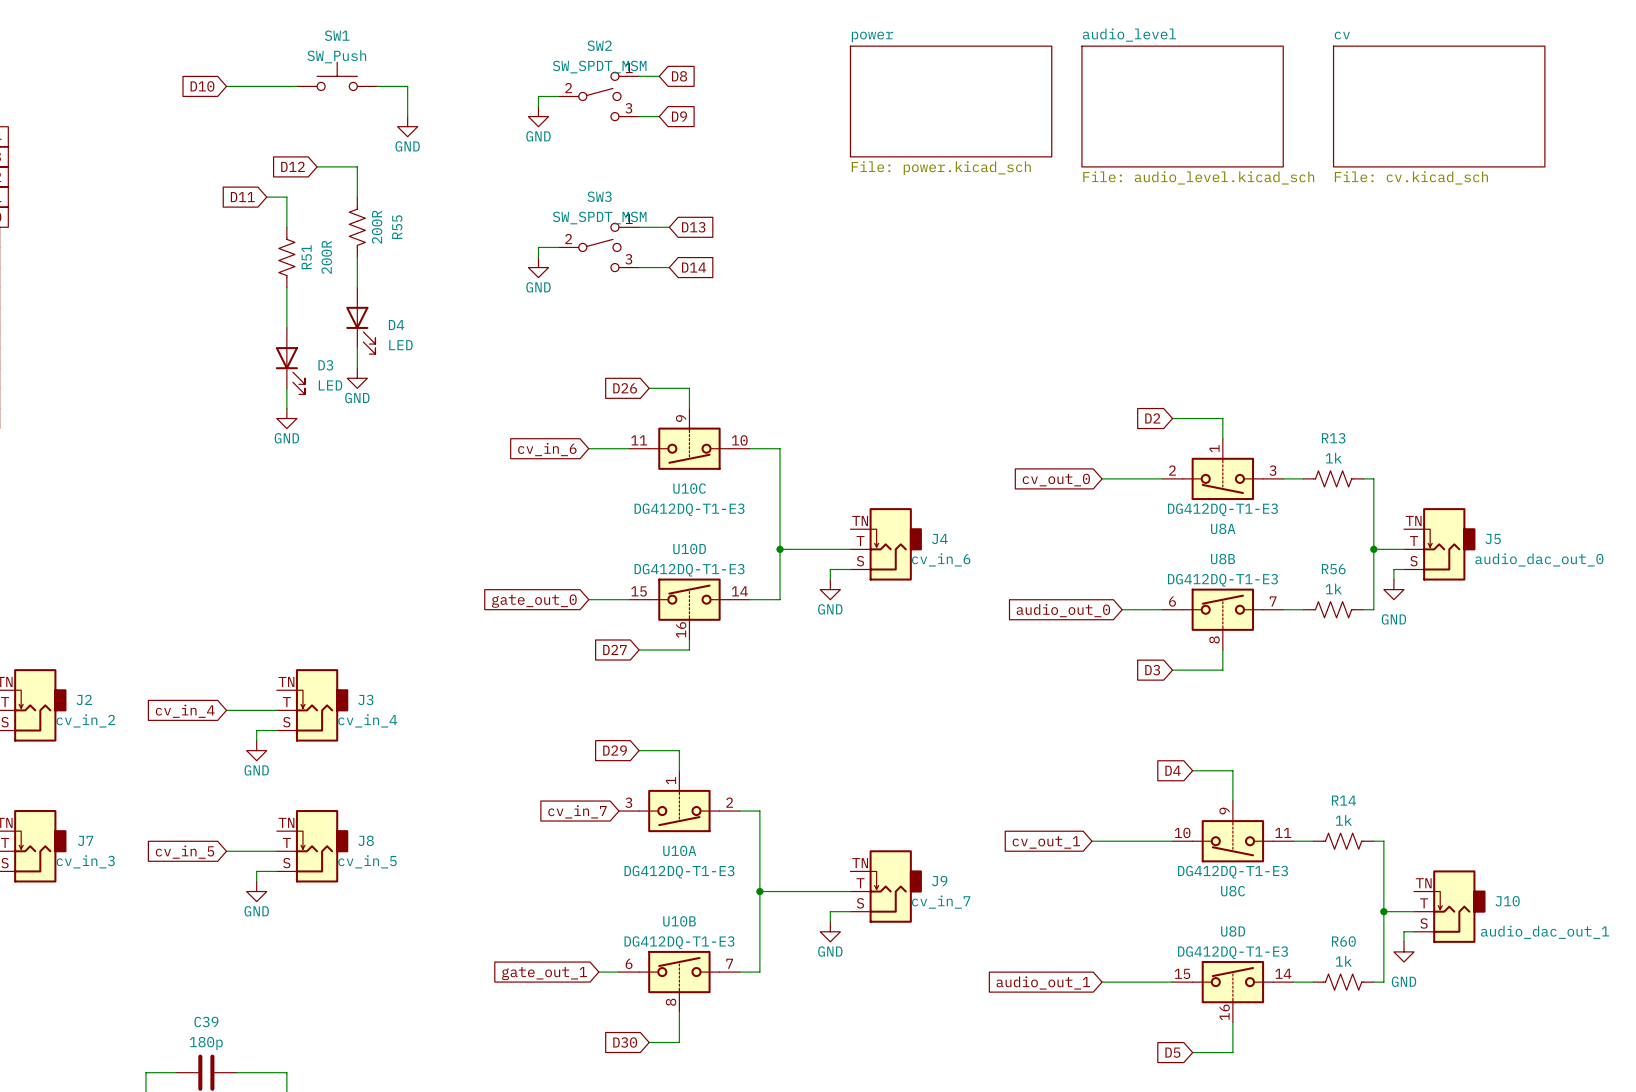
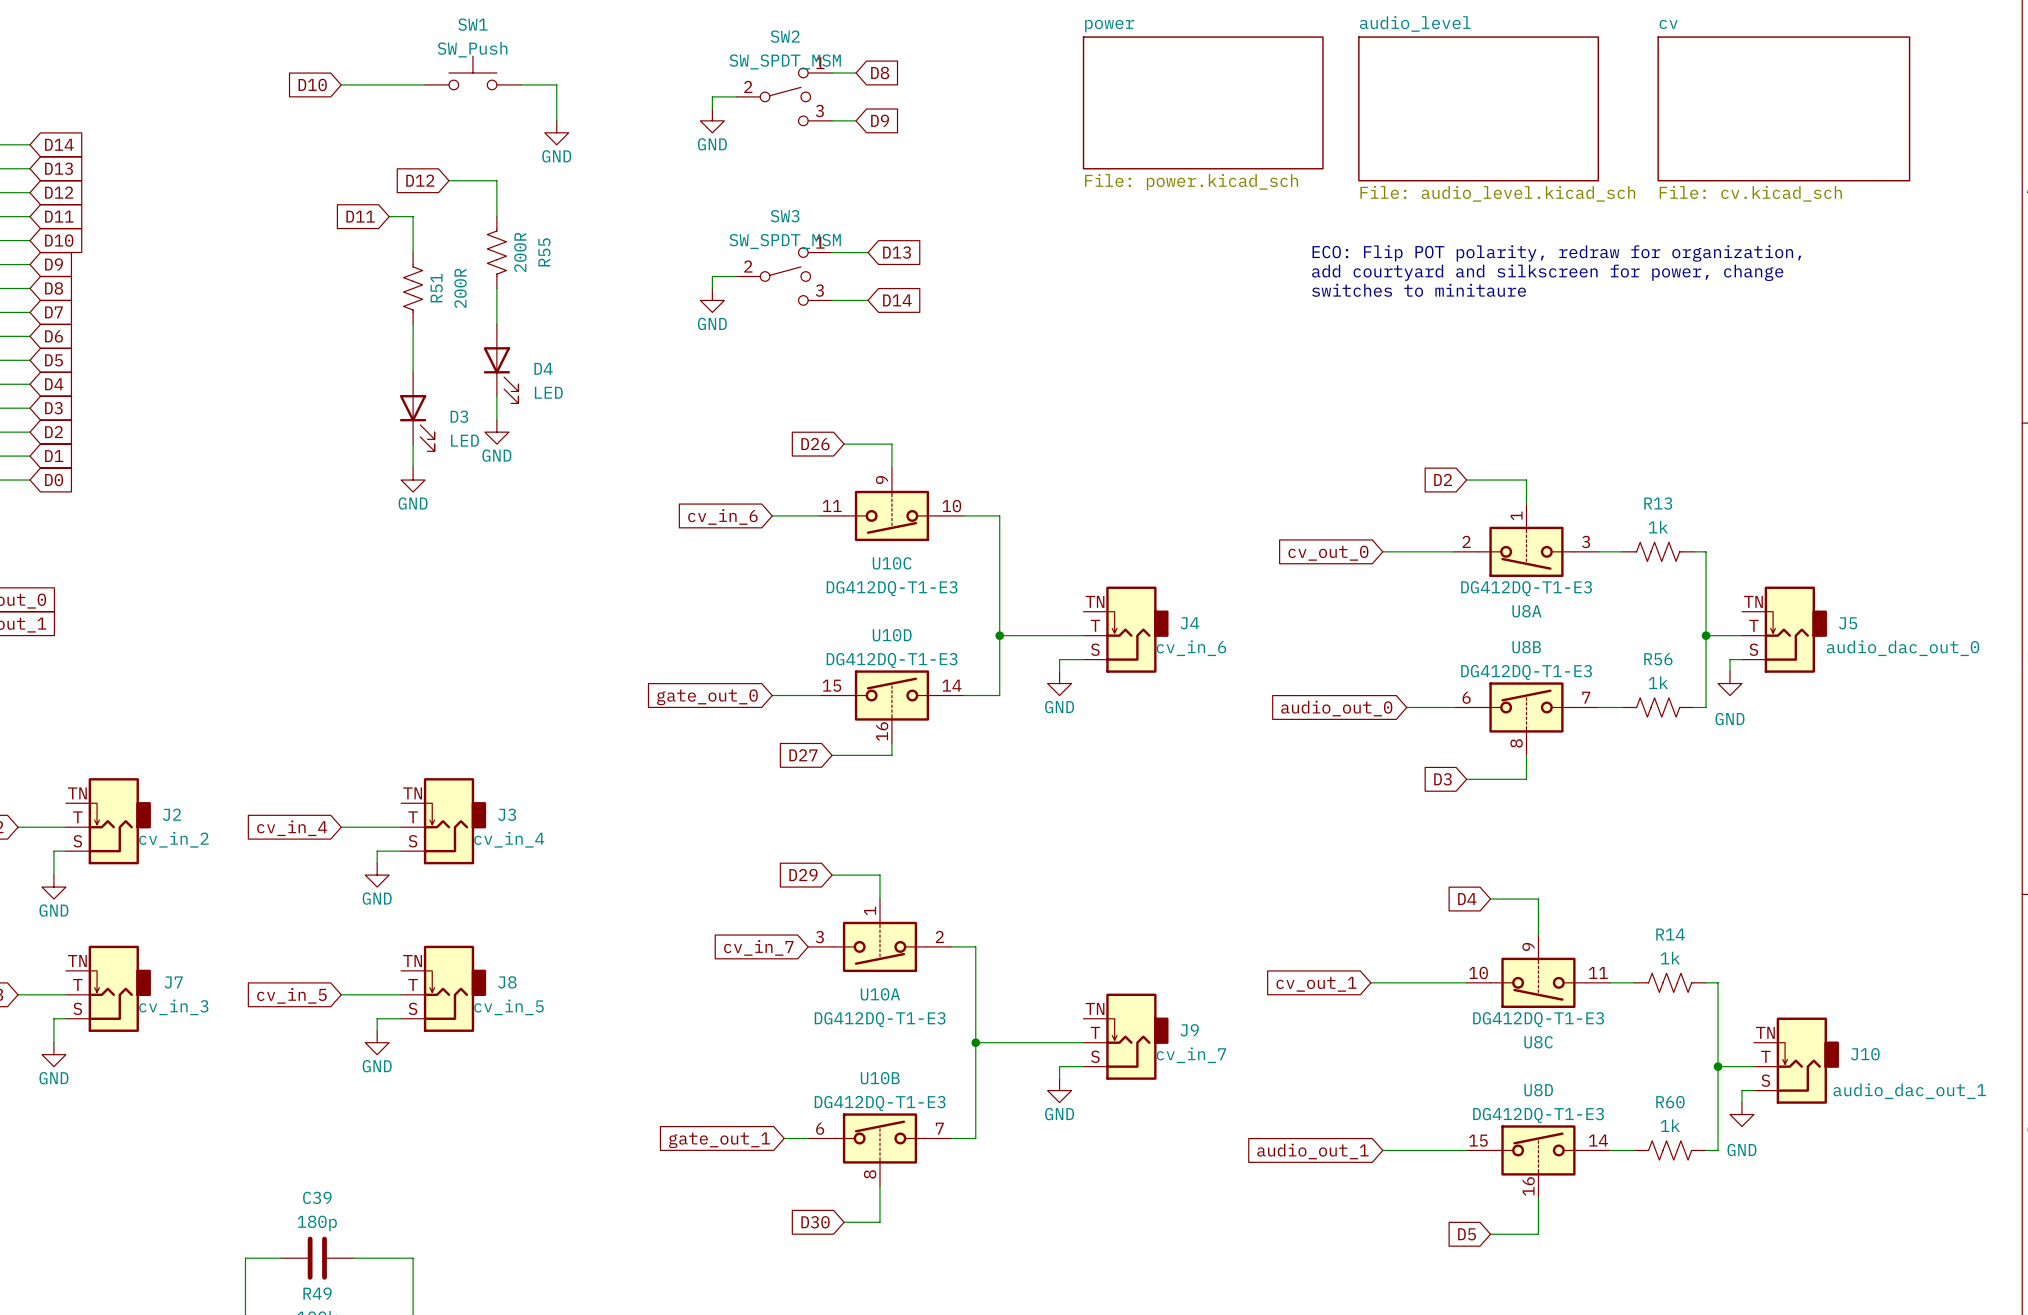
text: none -> ECO: Flip POT polarity, redraw for organization, (1556, 253)
text: none -> add courtyard and silkscreen for power, change (1547, 272)
text: none -> switches to minitaure (1419, 290)

